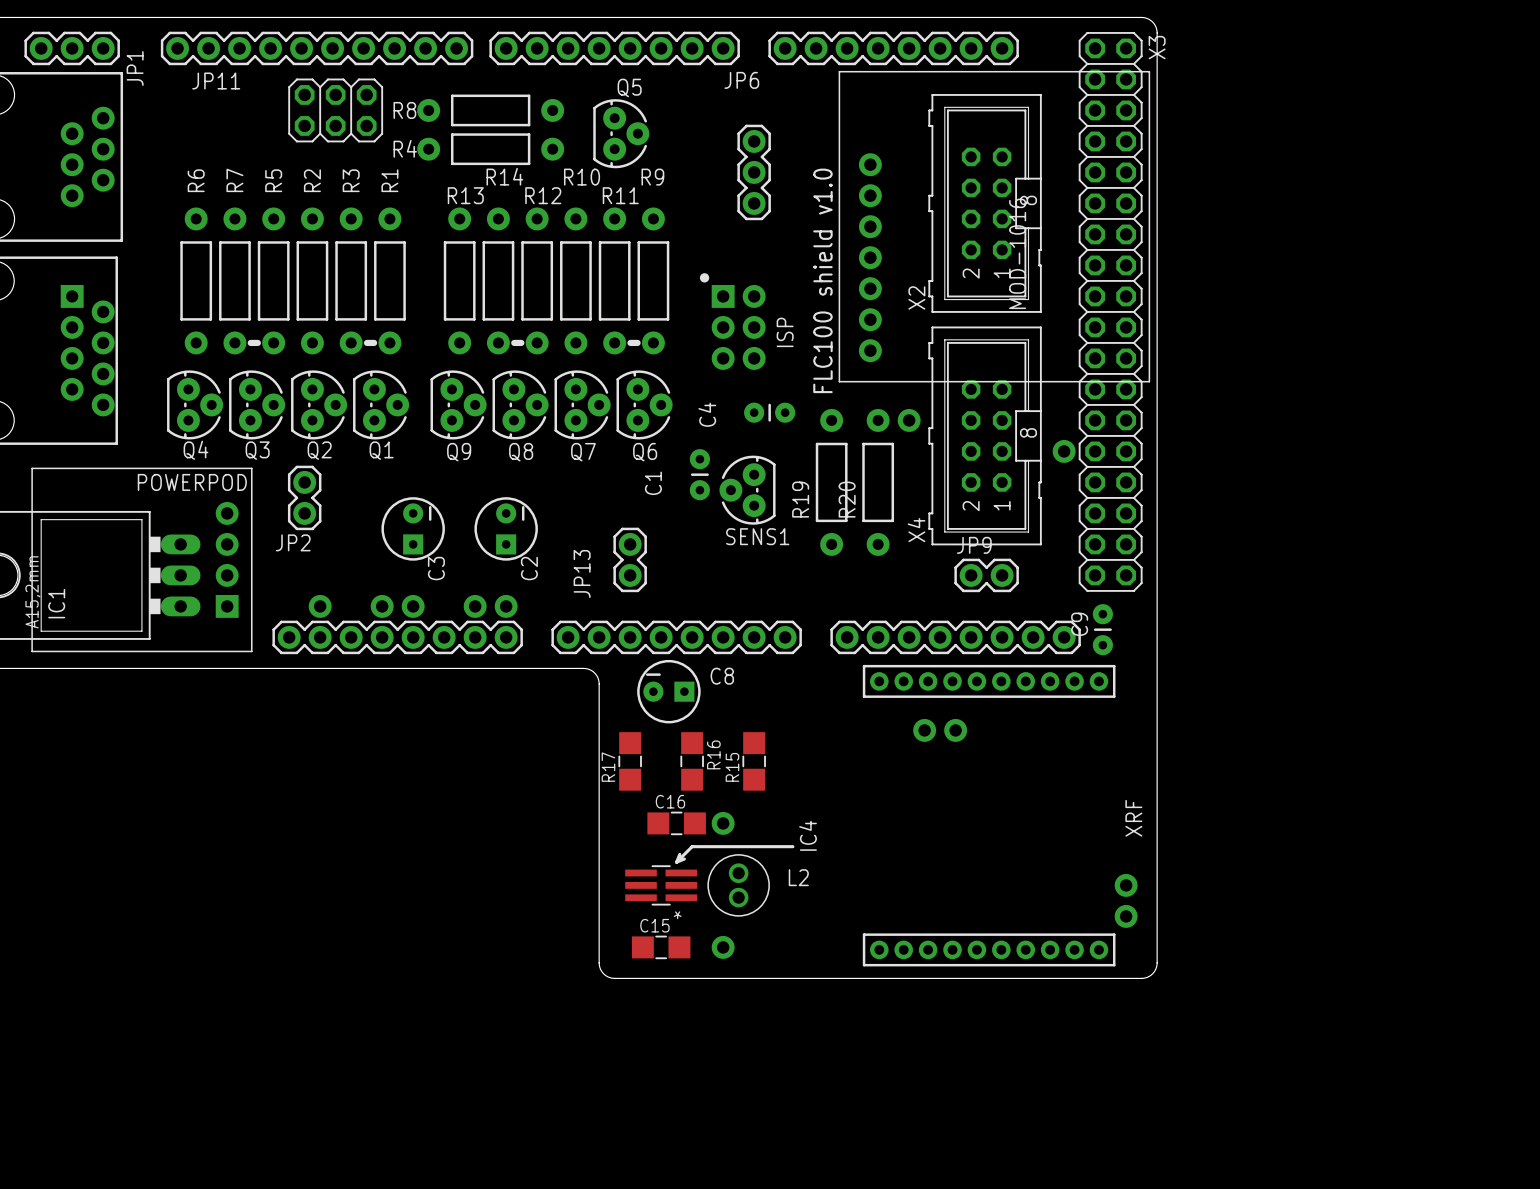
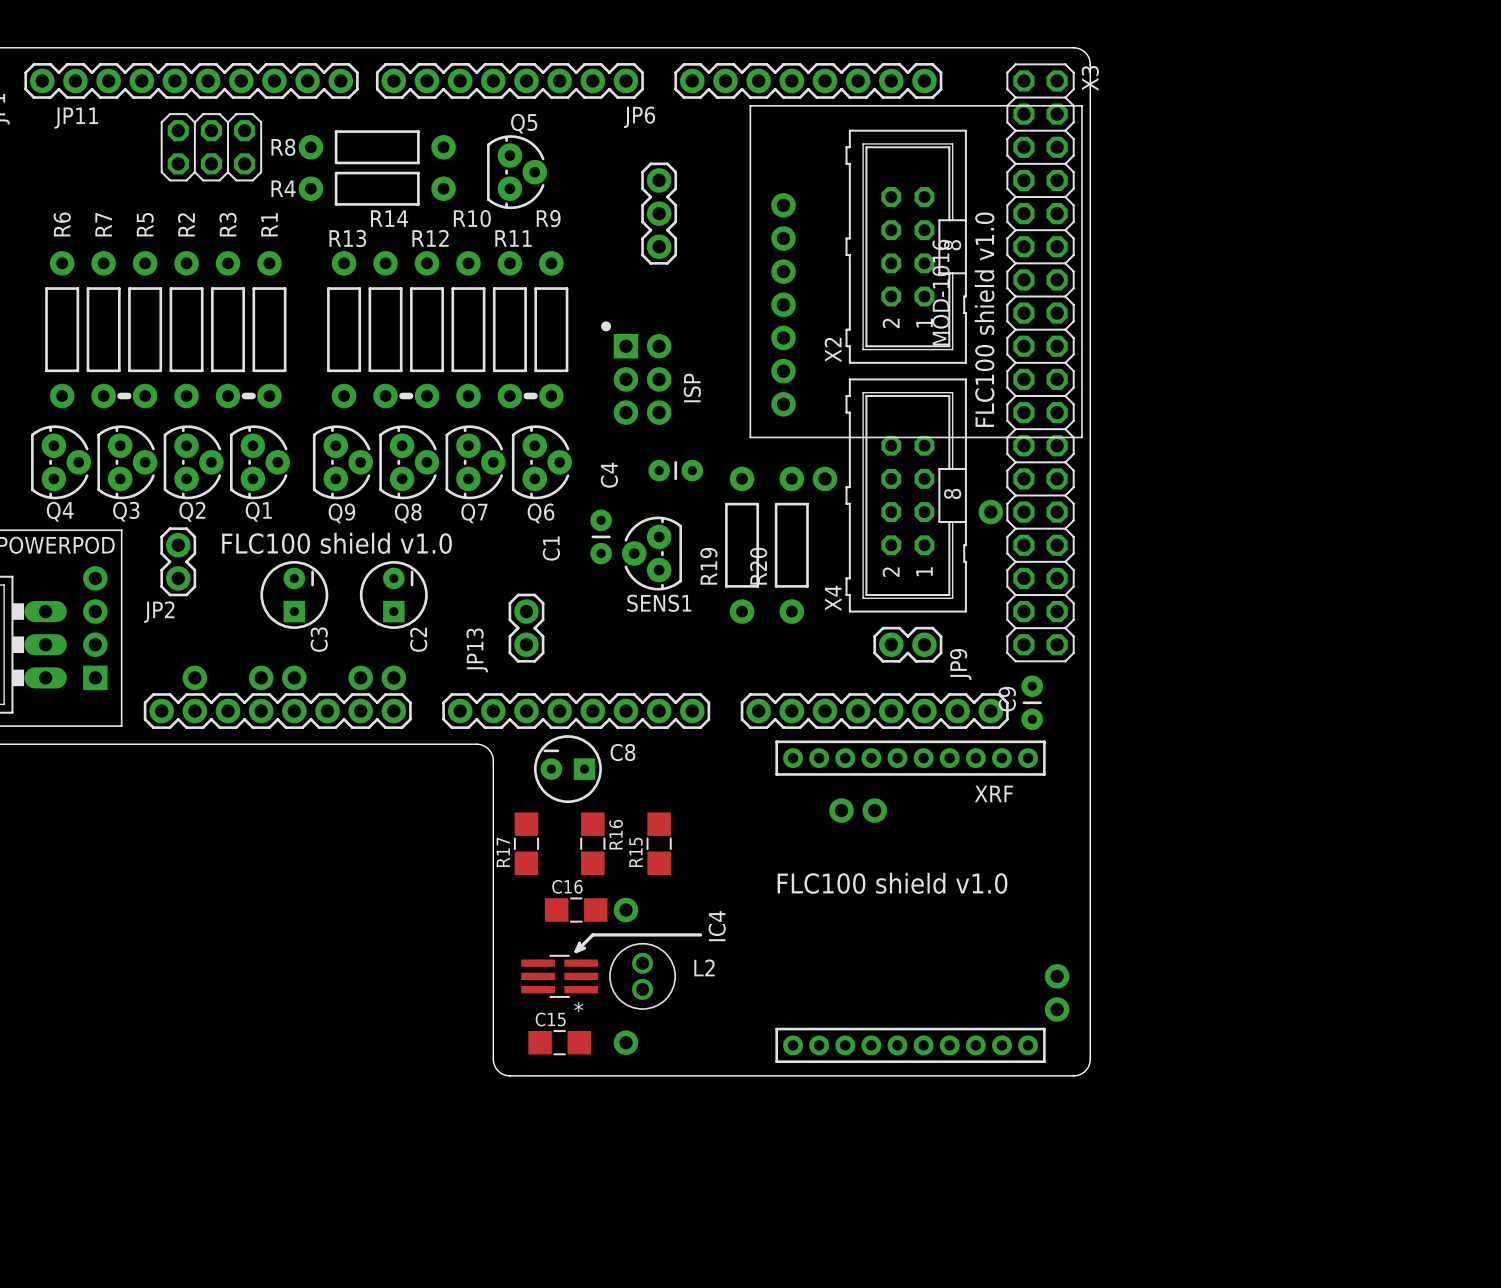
text: none -> FLC100 shield v1.0 (984, 319)
text: FLC100 shield v1.0 (822, 280) -> none
text: none -> FLC100 shield v1.0 (337, 543)
JP9 name rotation: 0° (974, 545) -> 90° counterclockwise (960, 664)
JP9 name position: JP9 (974, 545) -> JP9 (960, 664)
text: none -> FLC100 shield v1.0 (892, 883)
XRF name rotation: 0° (1133, 818) -> 90° clockwise (993, 793)
XRF name position: XRF (1133, 818) -> XRF (993, 793)

